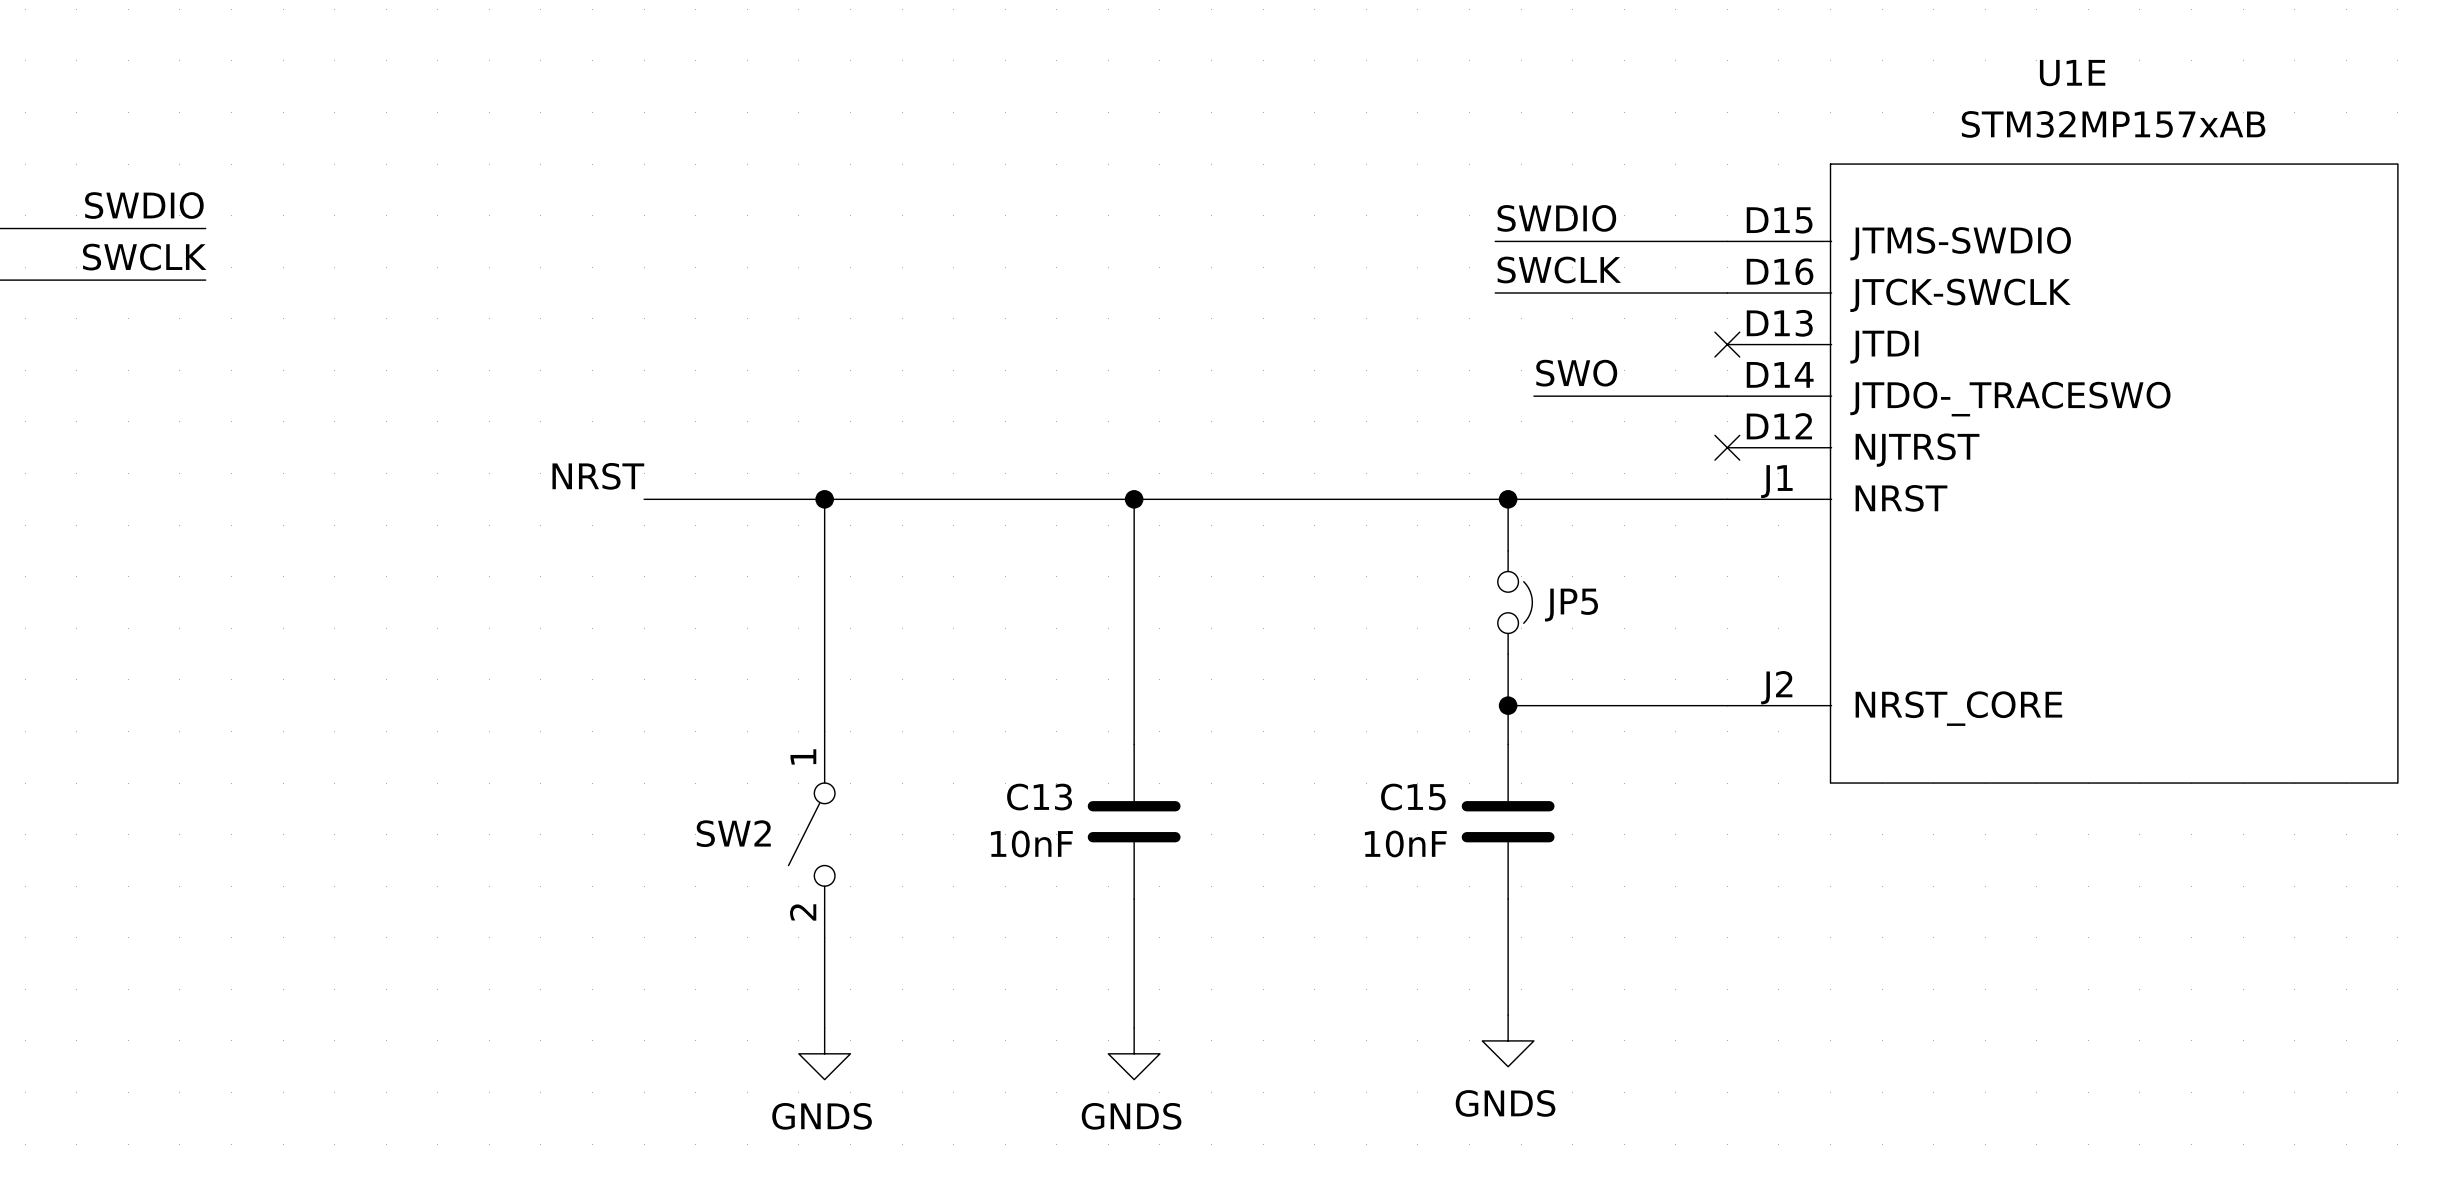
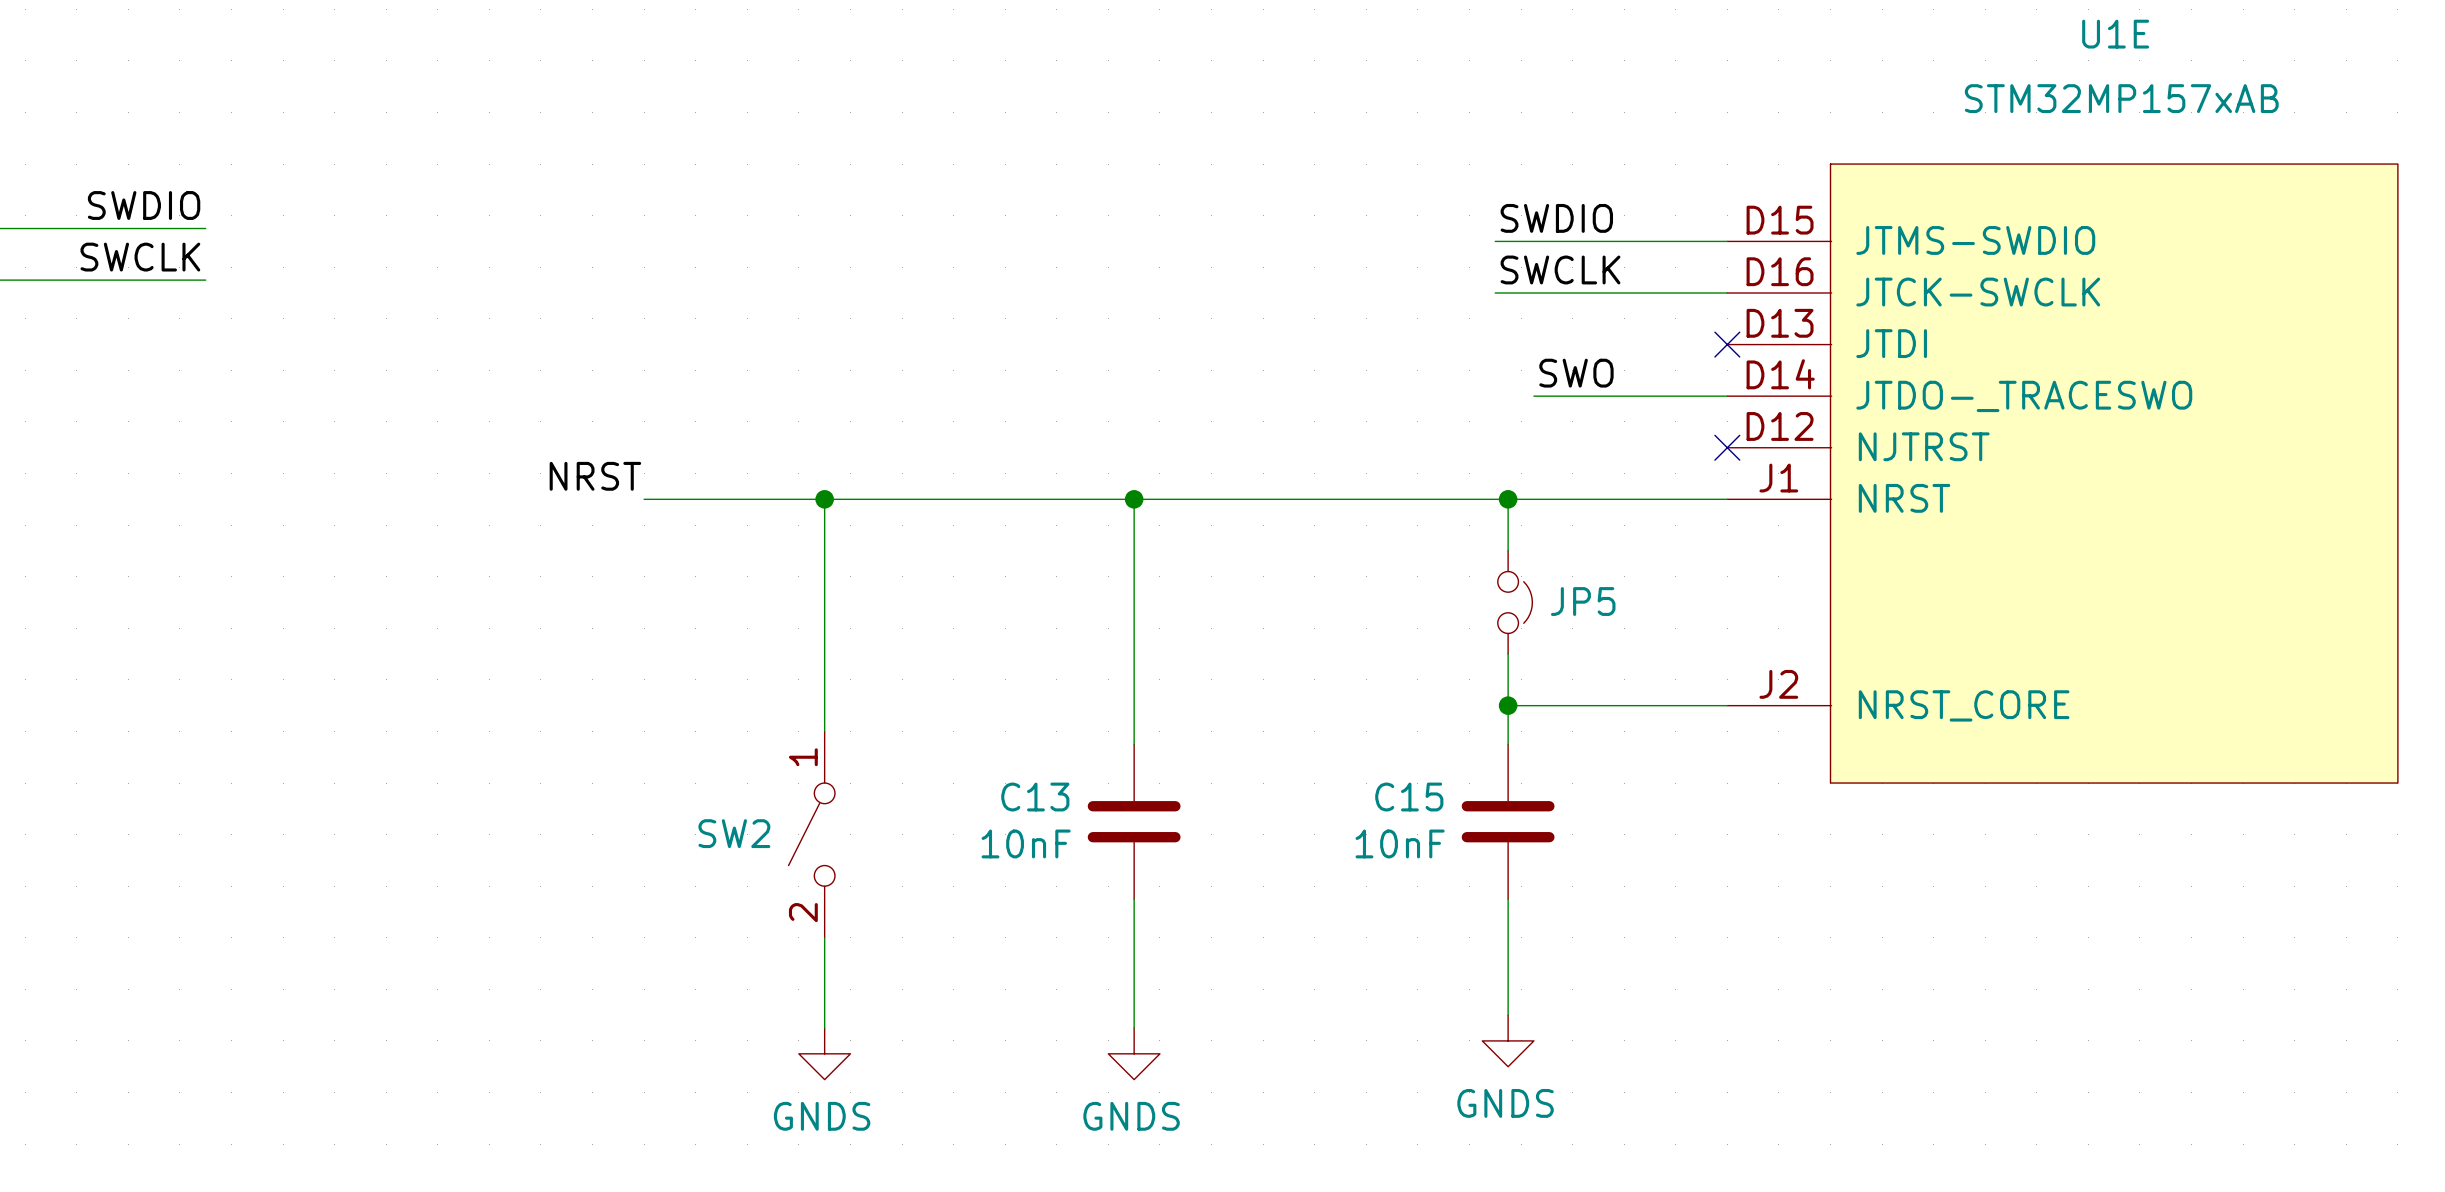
U1E name position: U1E (2072, 73) -> U1E (2115, 34)
U1E value position: STM32MP157xAB (2113, 124) -> STM32MP157xAB (2121, 98)

